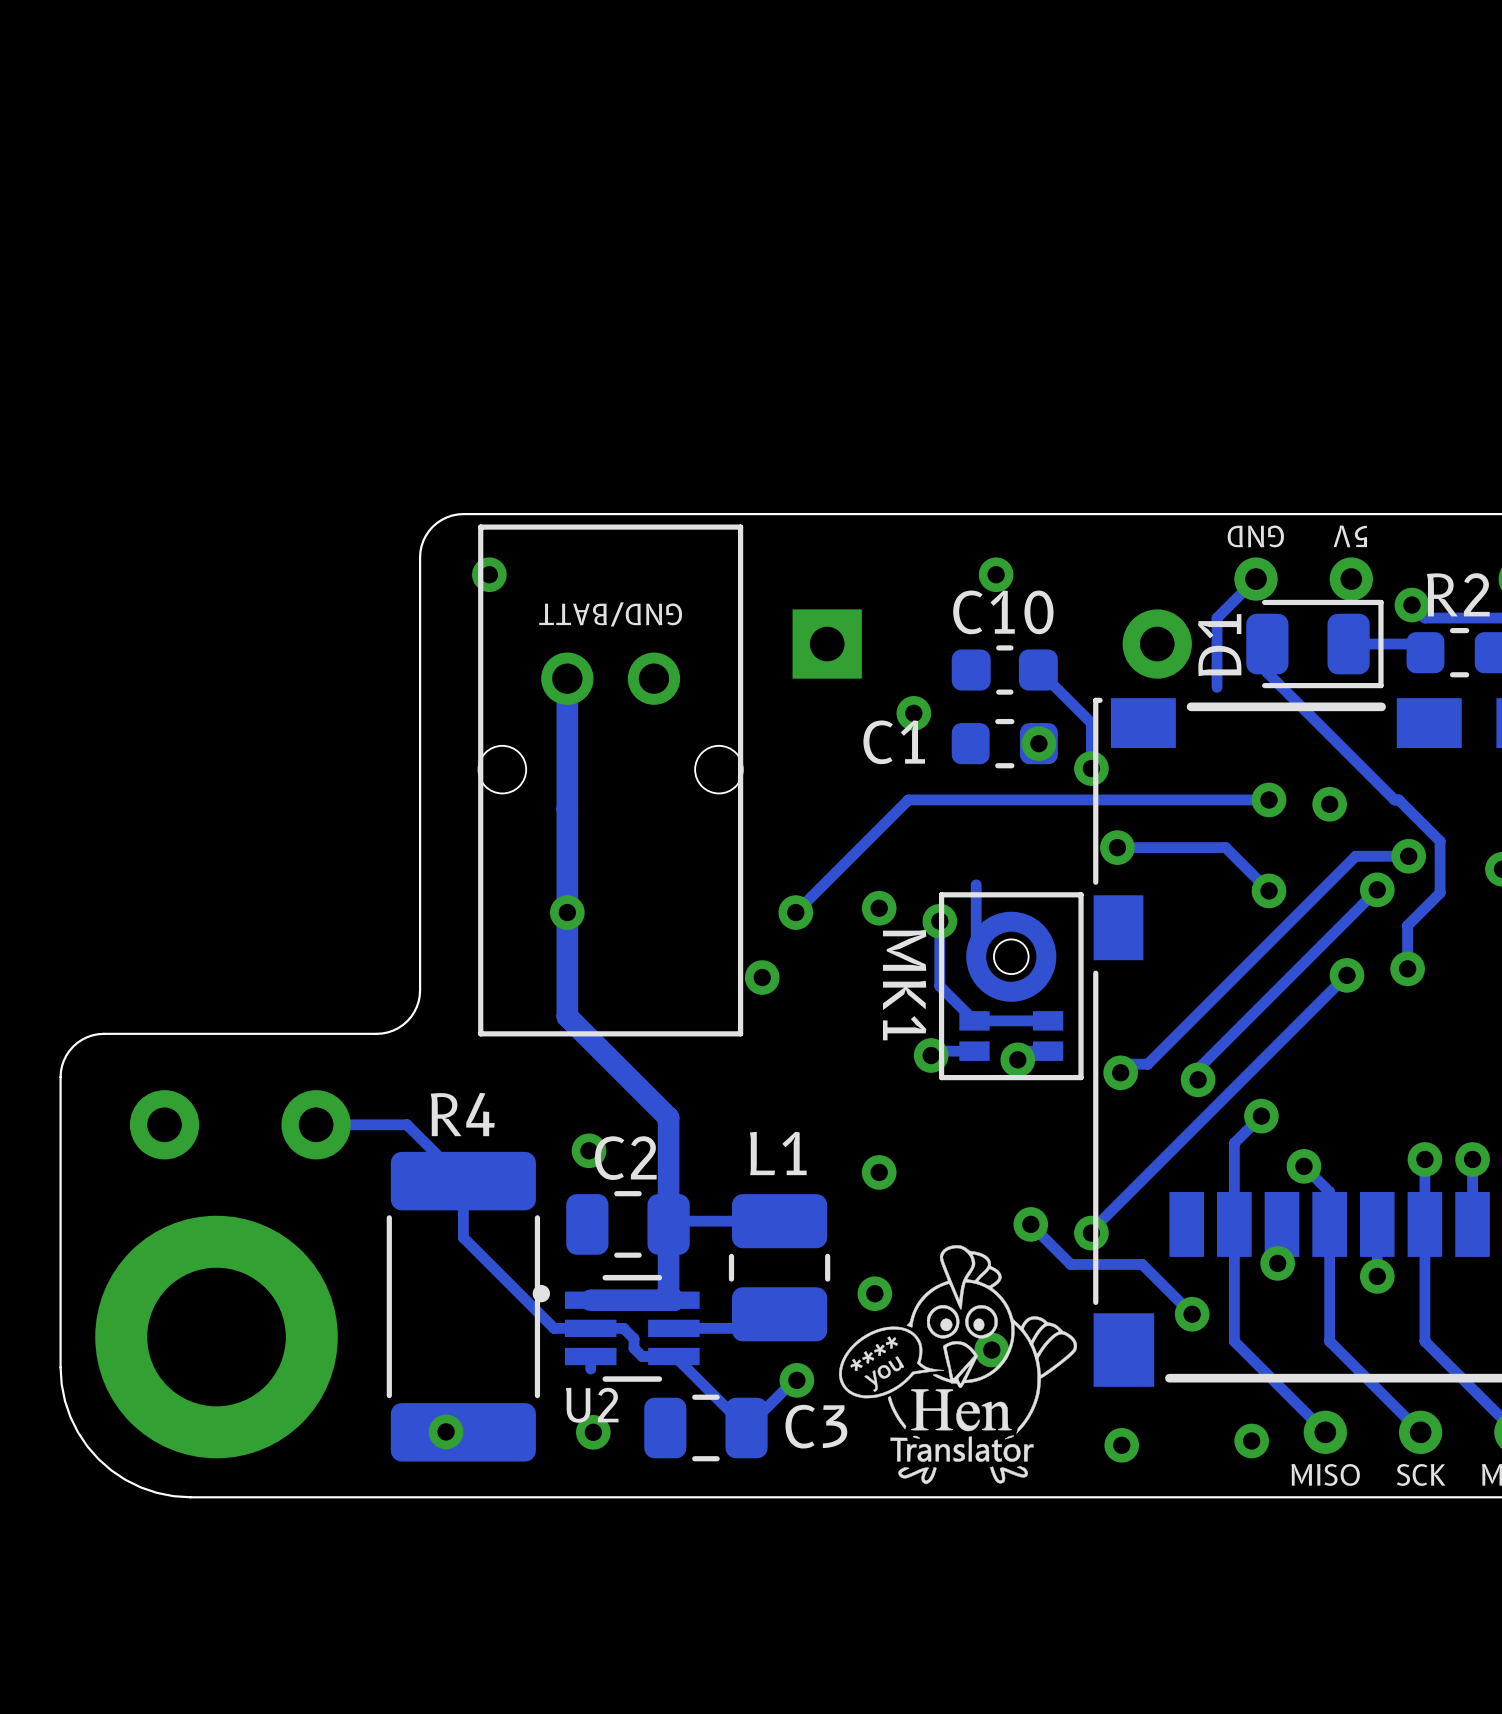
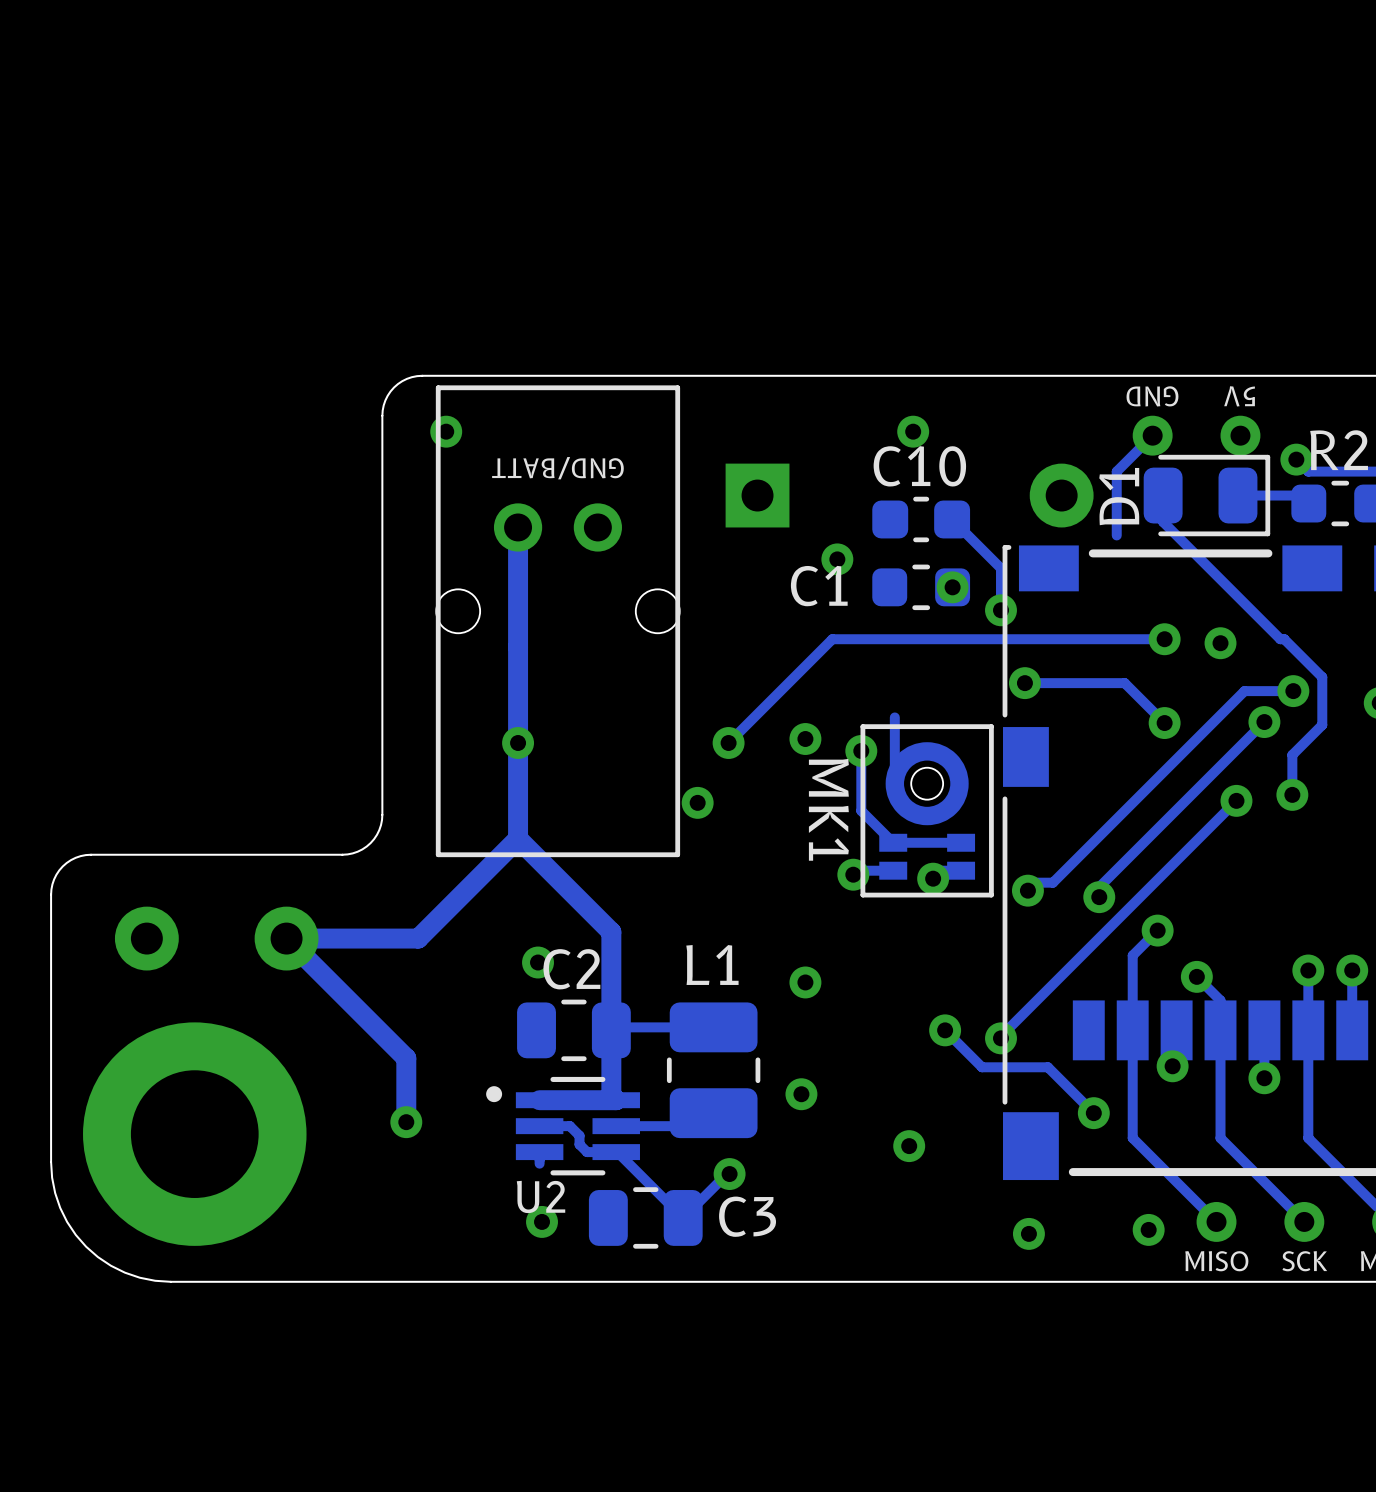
track: none -> (286, 938) (406, 1058) (406, 1122)
track: (407, 1124) (463, 1181) (463, 1237) (554, 1328) (590, 1328) -> (370, 938) (418, 938) (518, 838)
track width: thin (407, 1124) (316, 1124) -> thick (370, 938) (286, 938)
drawing: [839, 1245, 1078, 1485] -> none
R4: (463, 1306) -> none
via position: (446, 1431) -> (406, 1122)

